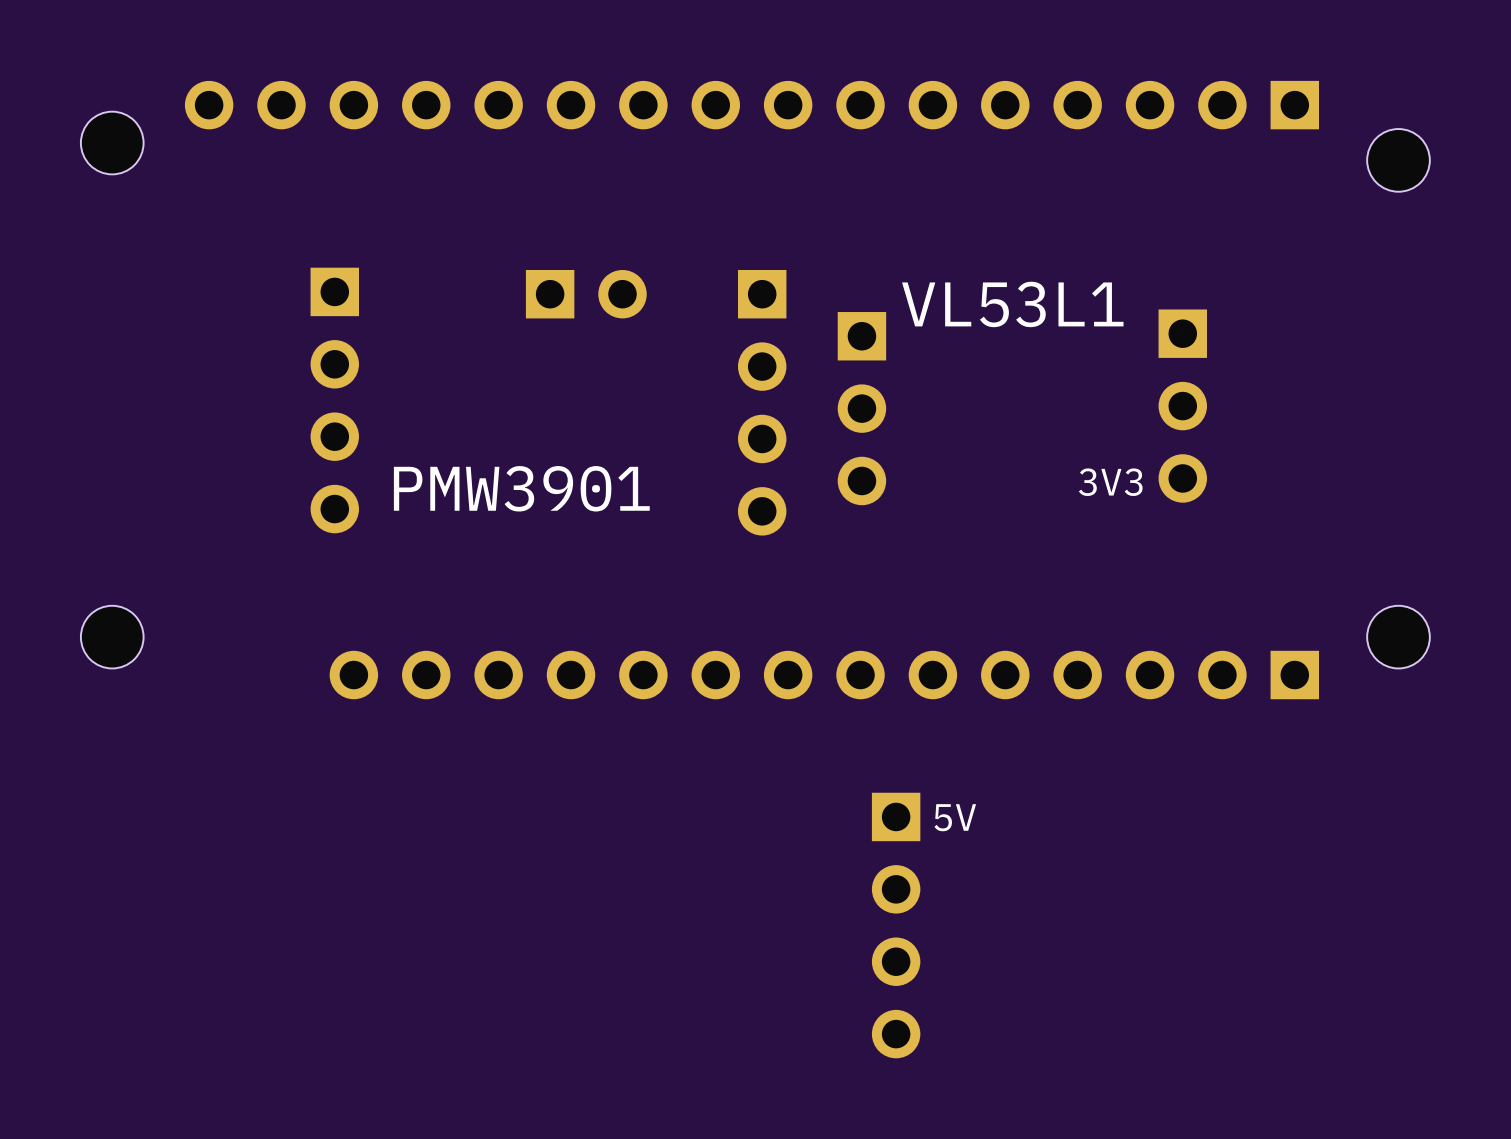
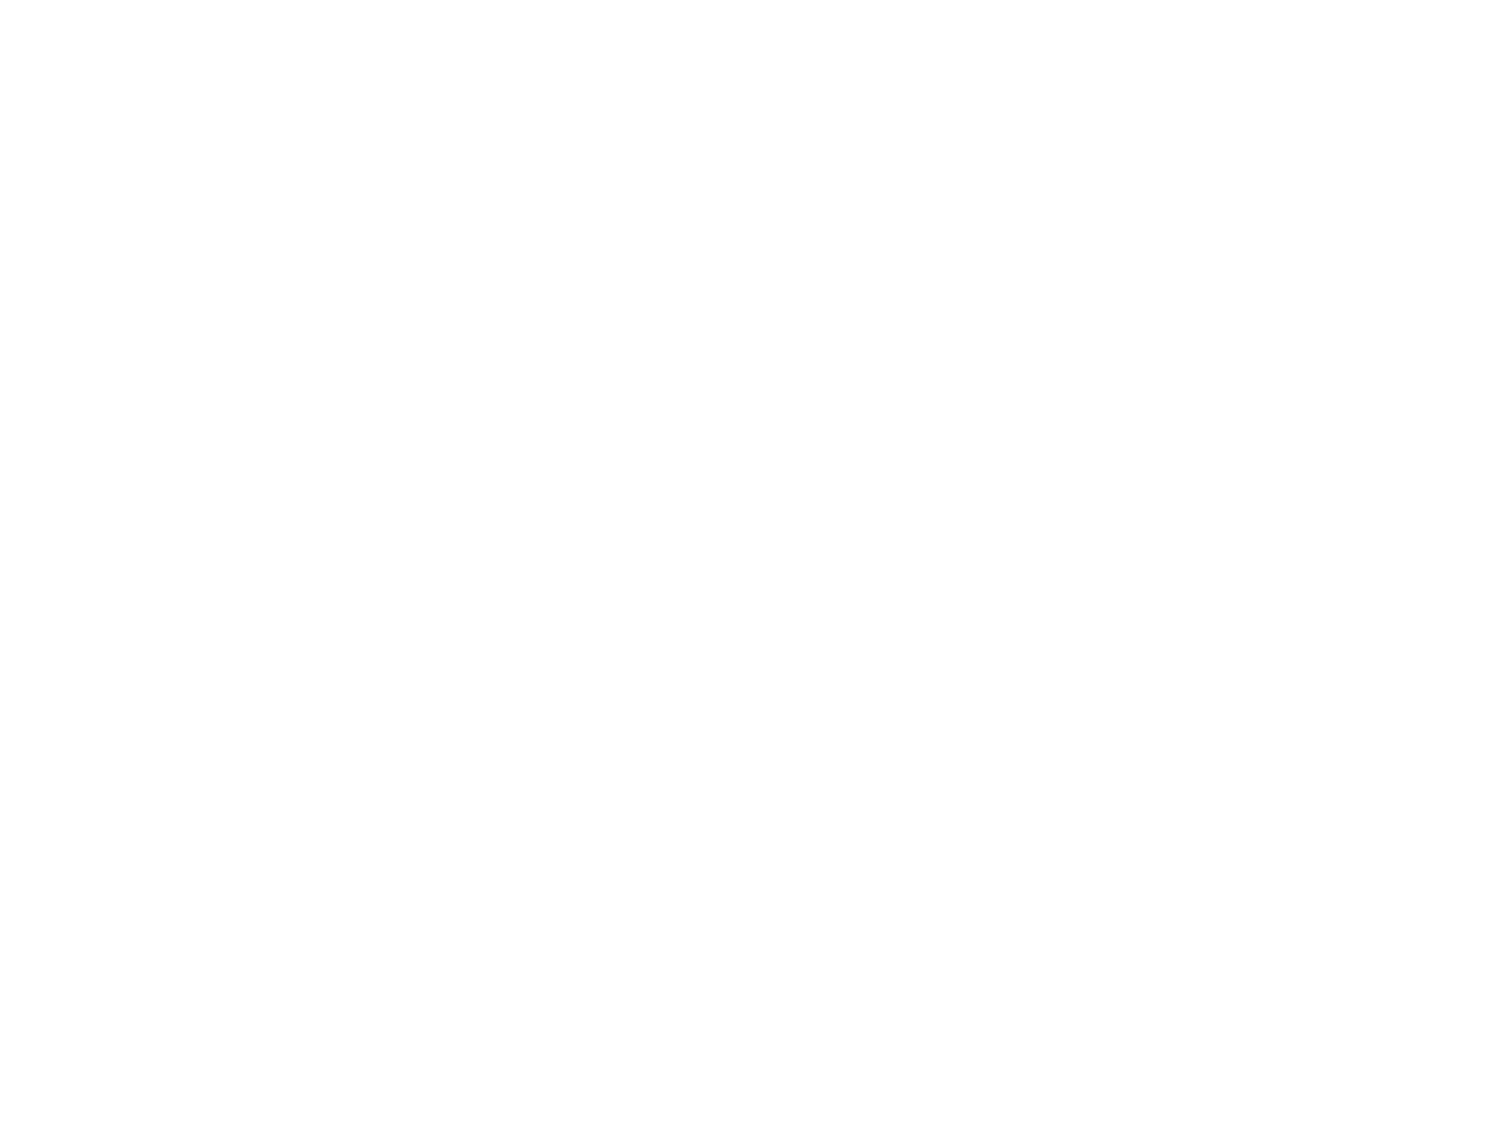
part: (751, 105) -> none
part: (112, 143) -> none
part: (1398, 160) -> none
part: (586, 294) -> none
text: VL53L1 (1012, 304) -> none
part: (334, 400) -> none
part: (762, 402) -> none
part: (1182, 406) -> none
part: (861, 408) -> none
text: 3V3 (1110, 482) -> none
text: PMW3901 (521, 488) -> none
part: (112, 637) -> none
part: (1398, 637) -> none
part: (824, 675) -> none
text: 5V (955, 817) -> none
part: (896, 925) -> none

